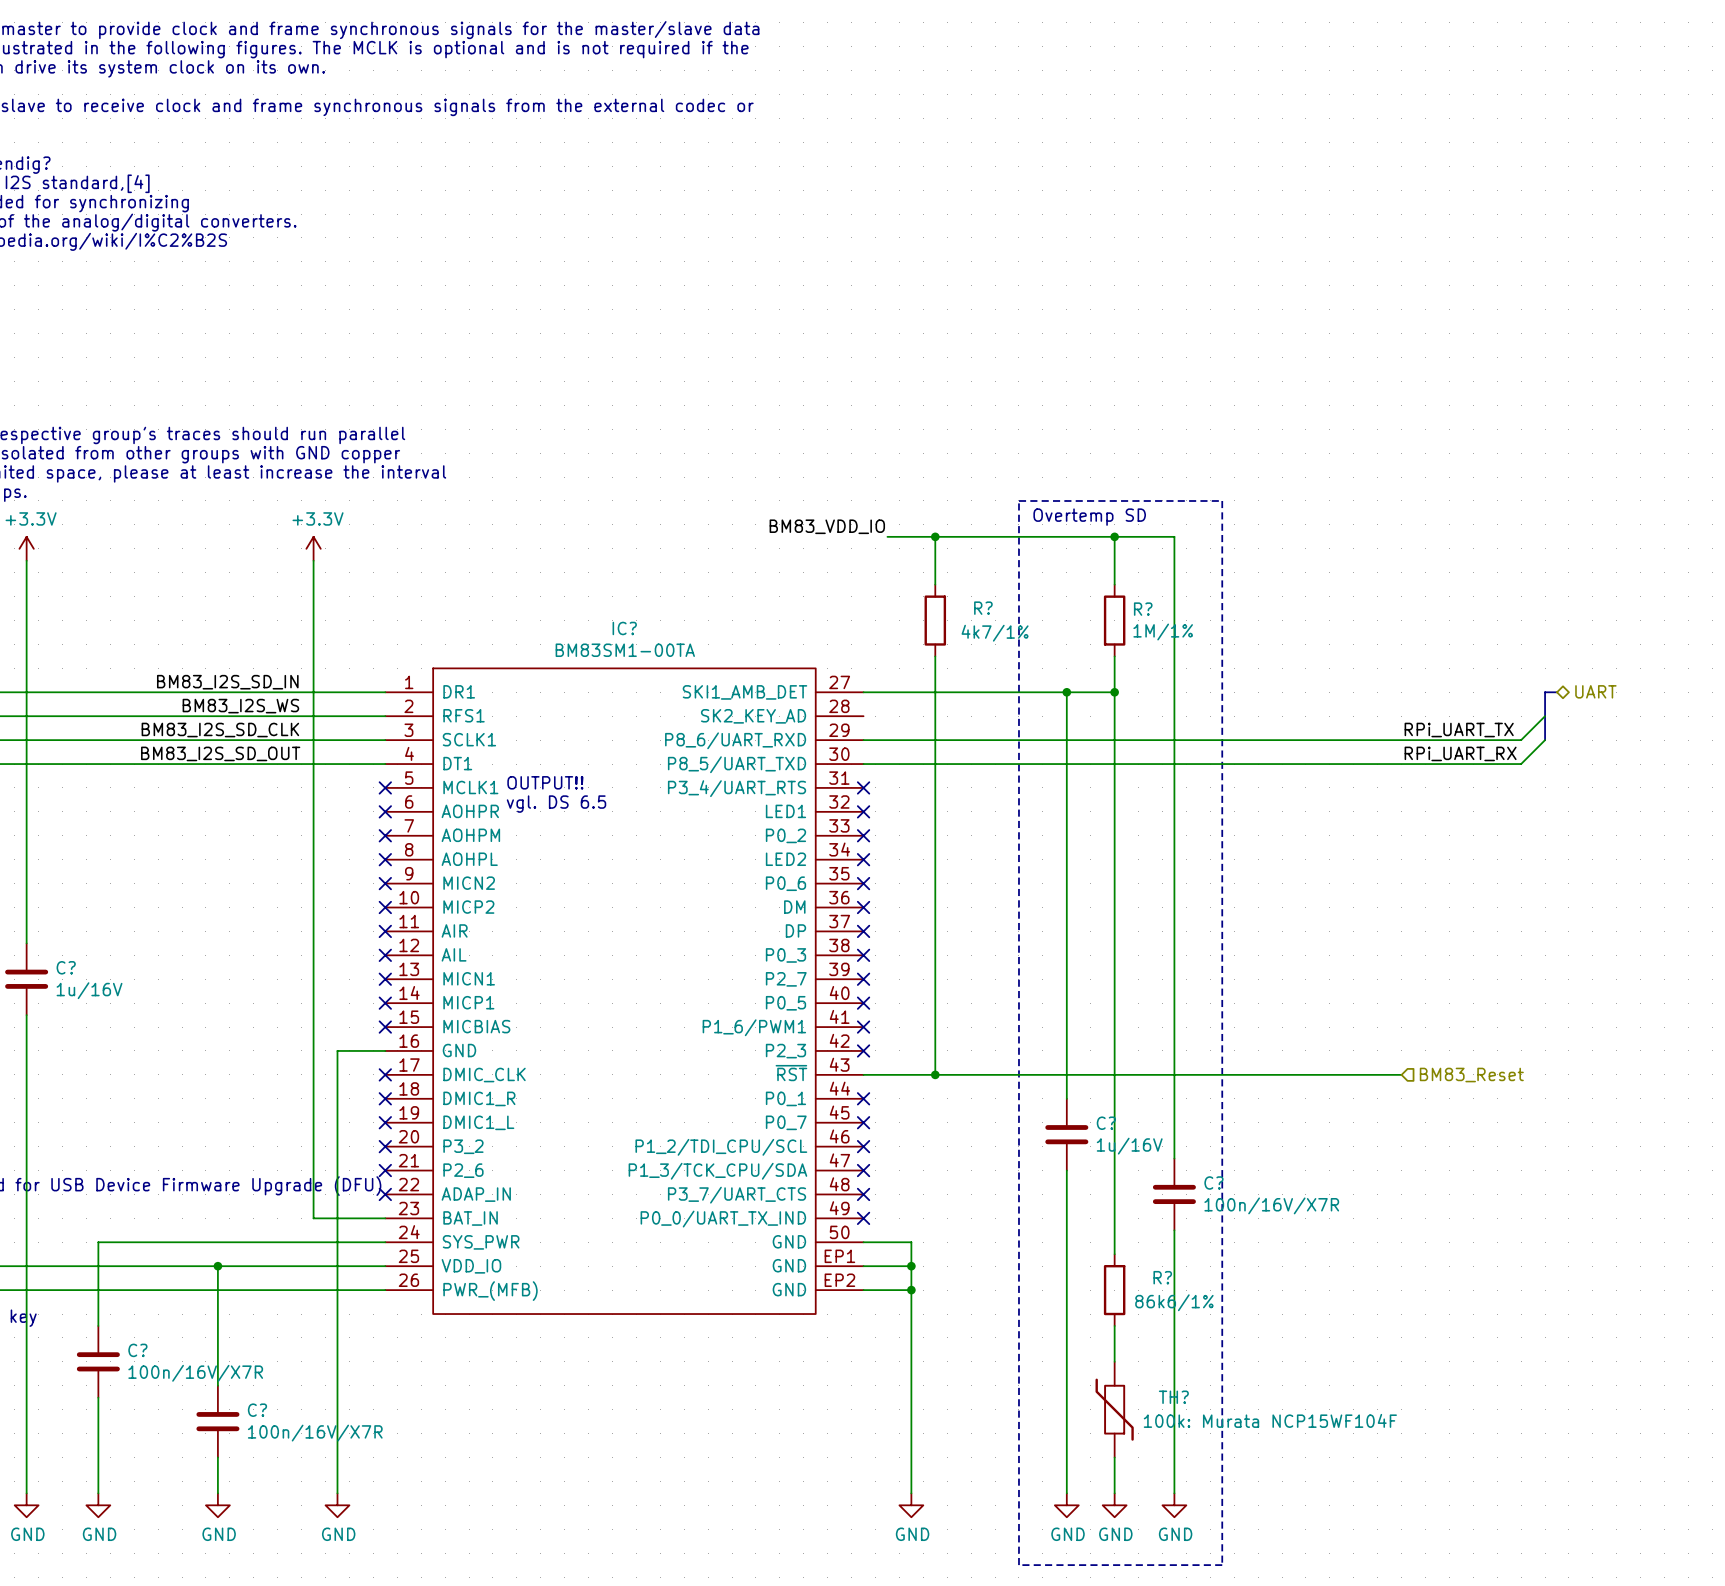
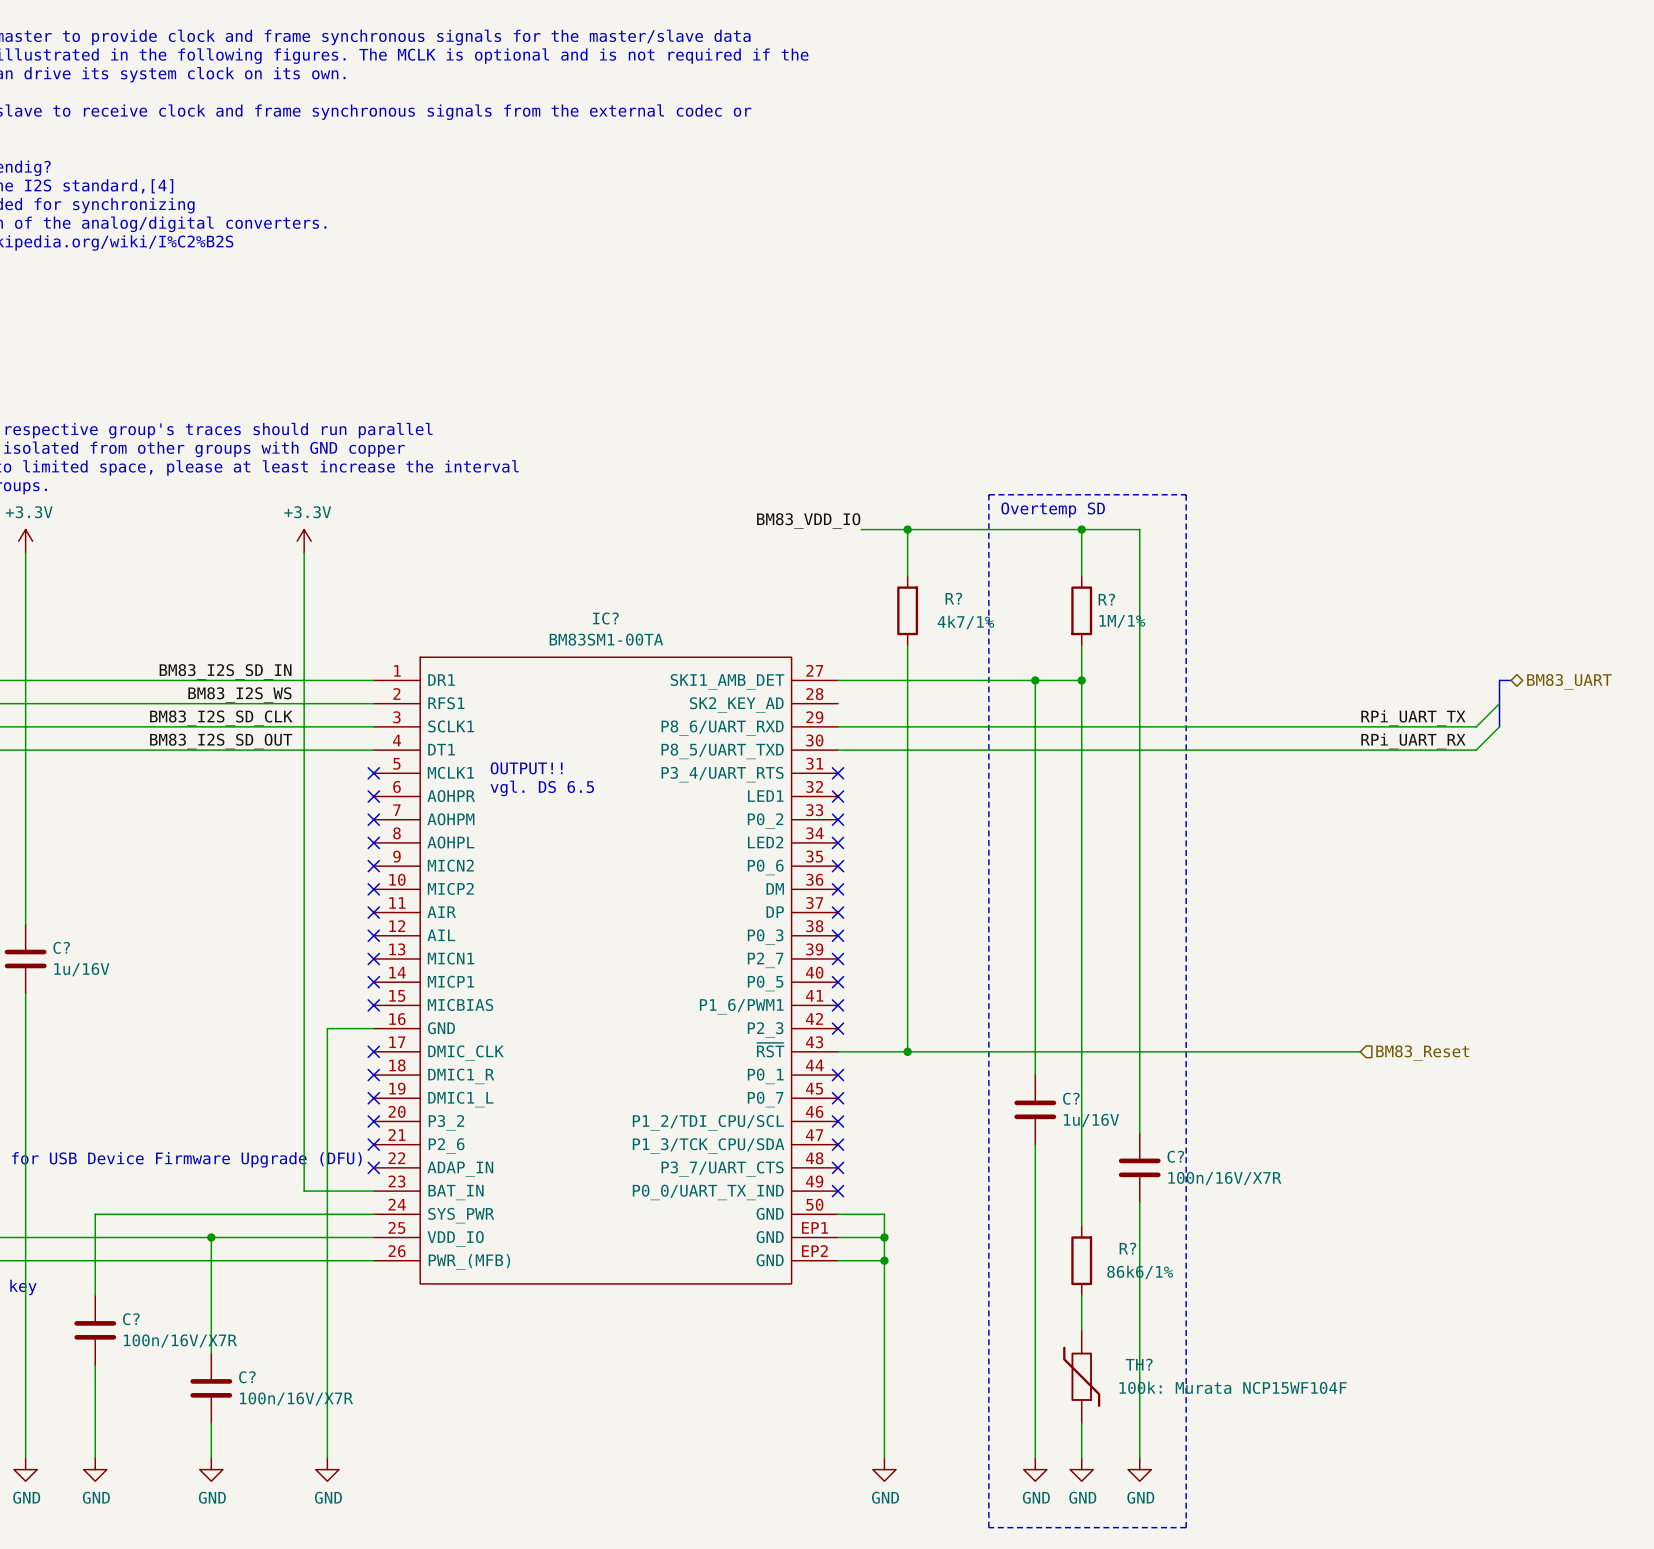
hierarchical label: UART (1595, 691) -> BM83_UART (1569, 681)

